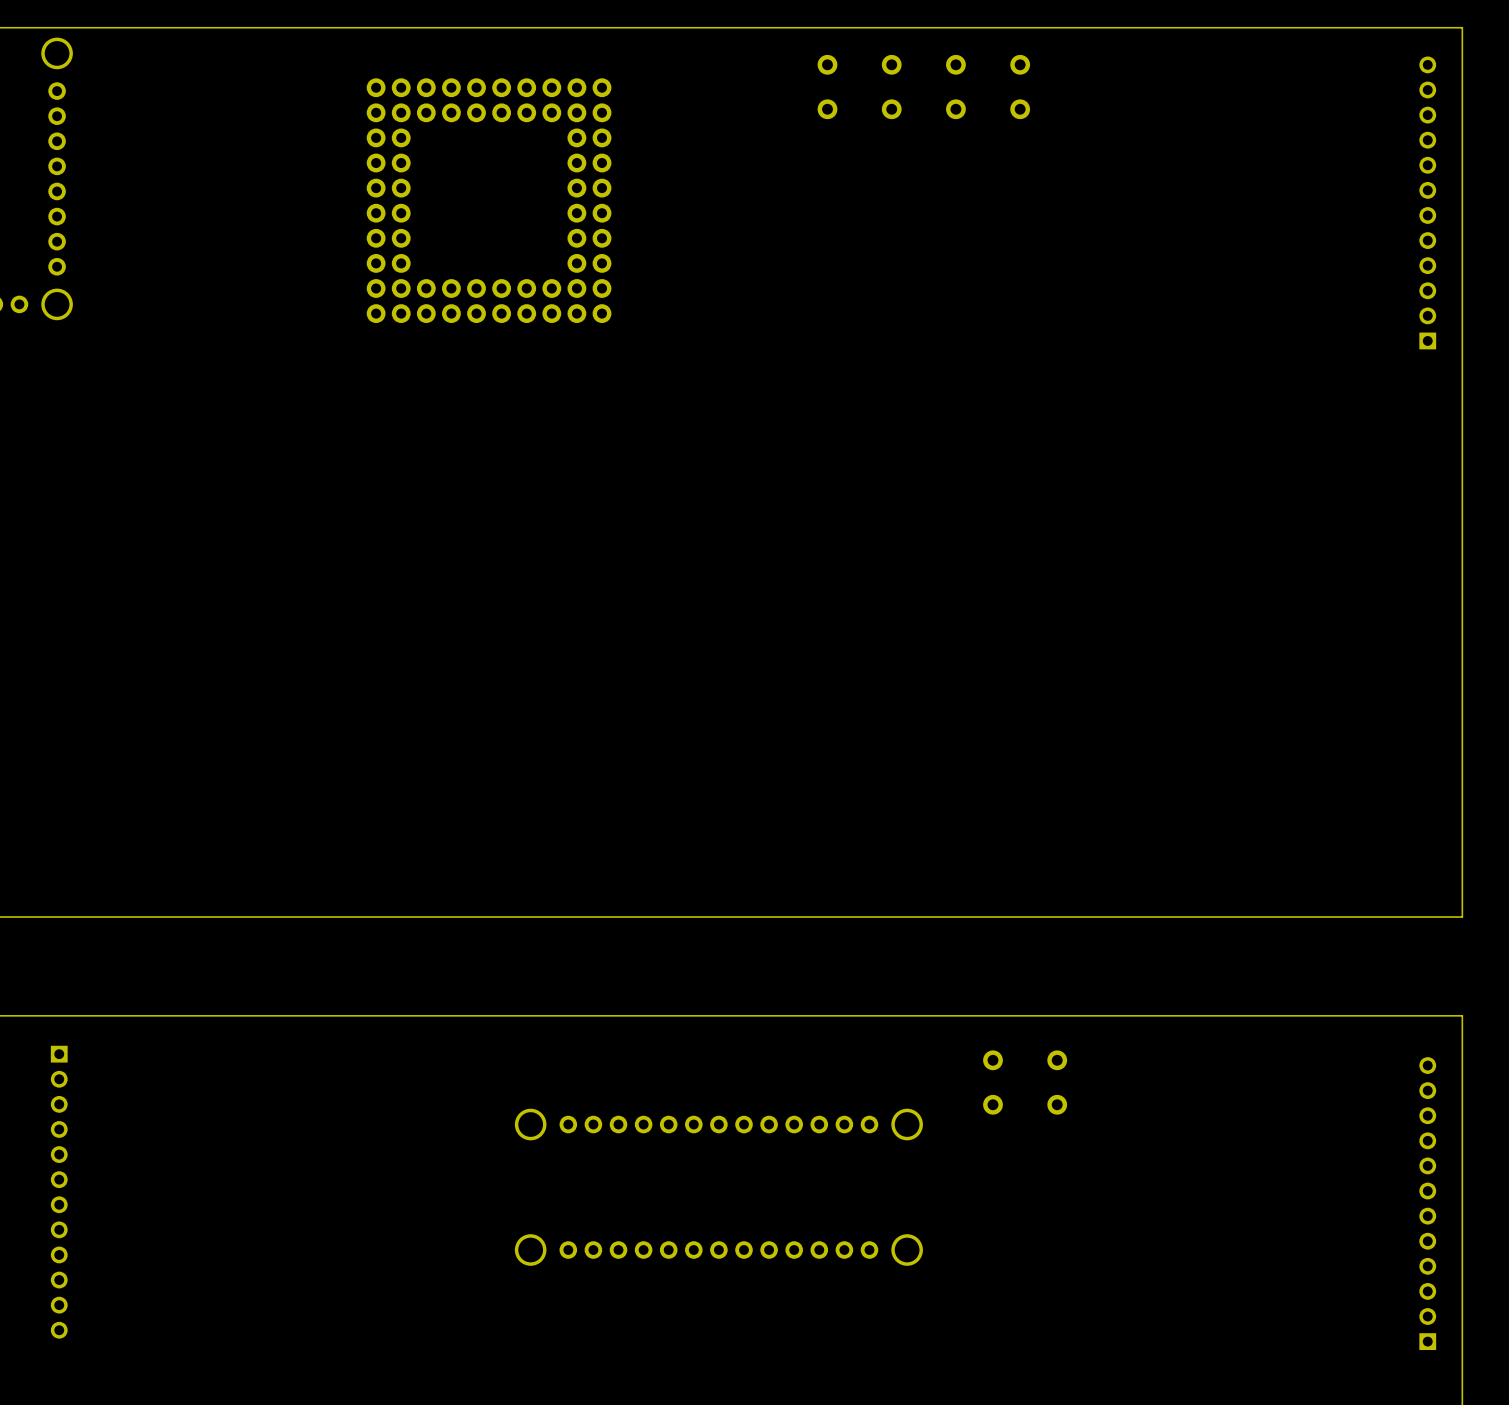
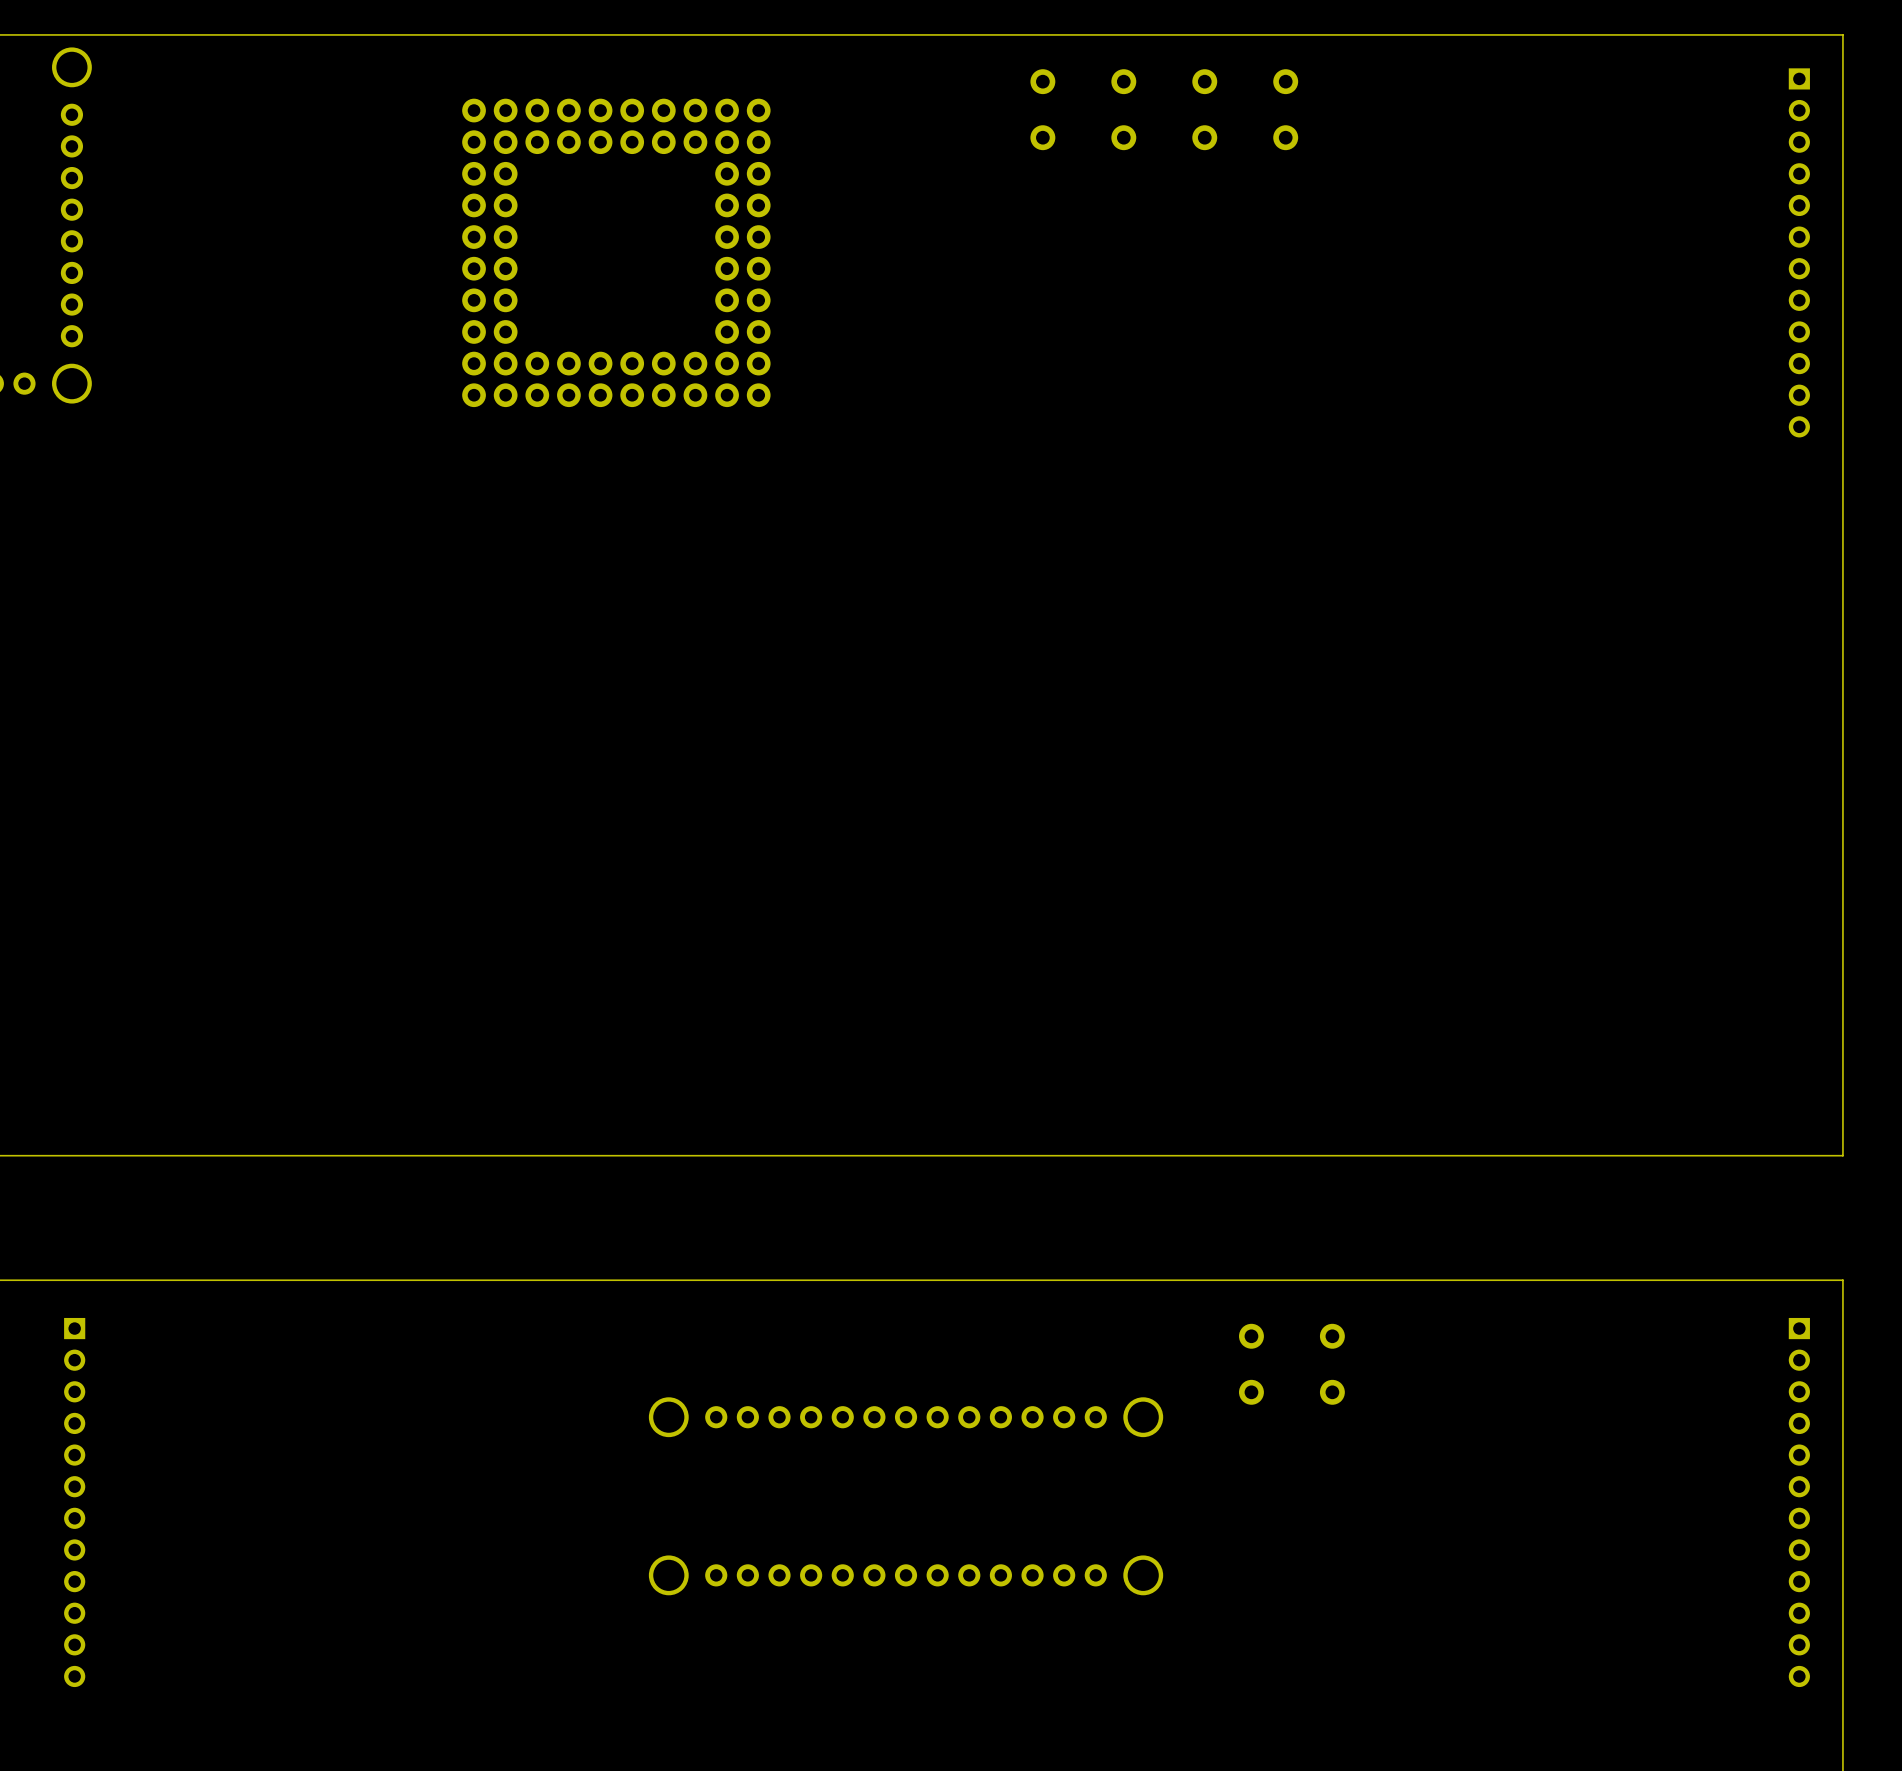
part rotation: 0° (1427, 202) -> 180° (1799, 252)
part rotation: 0° (1427, 1203) -> 180° (1799, 1502)

